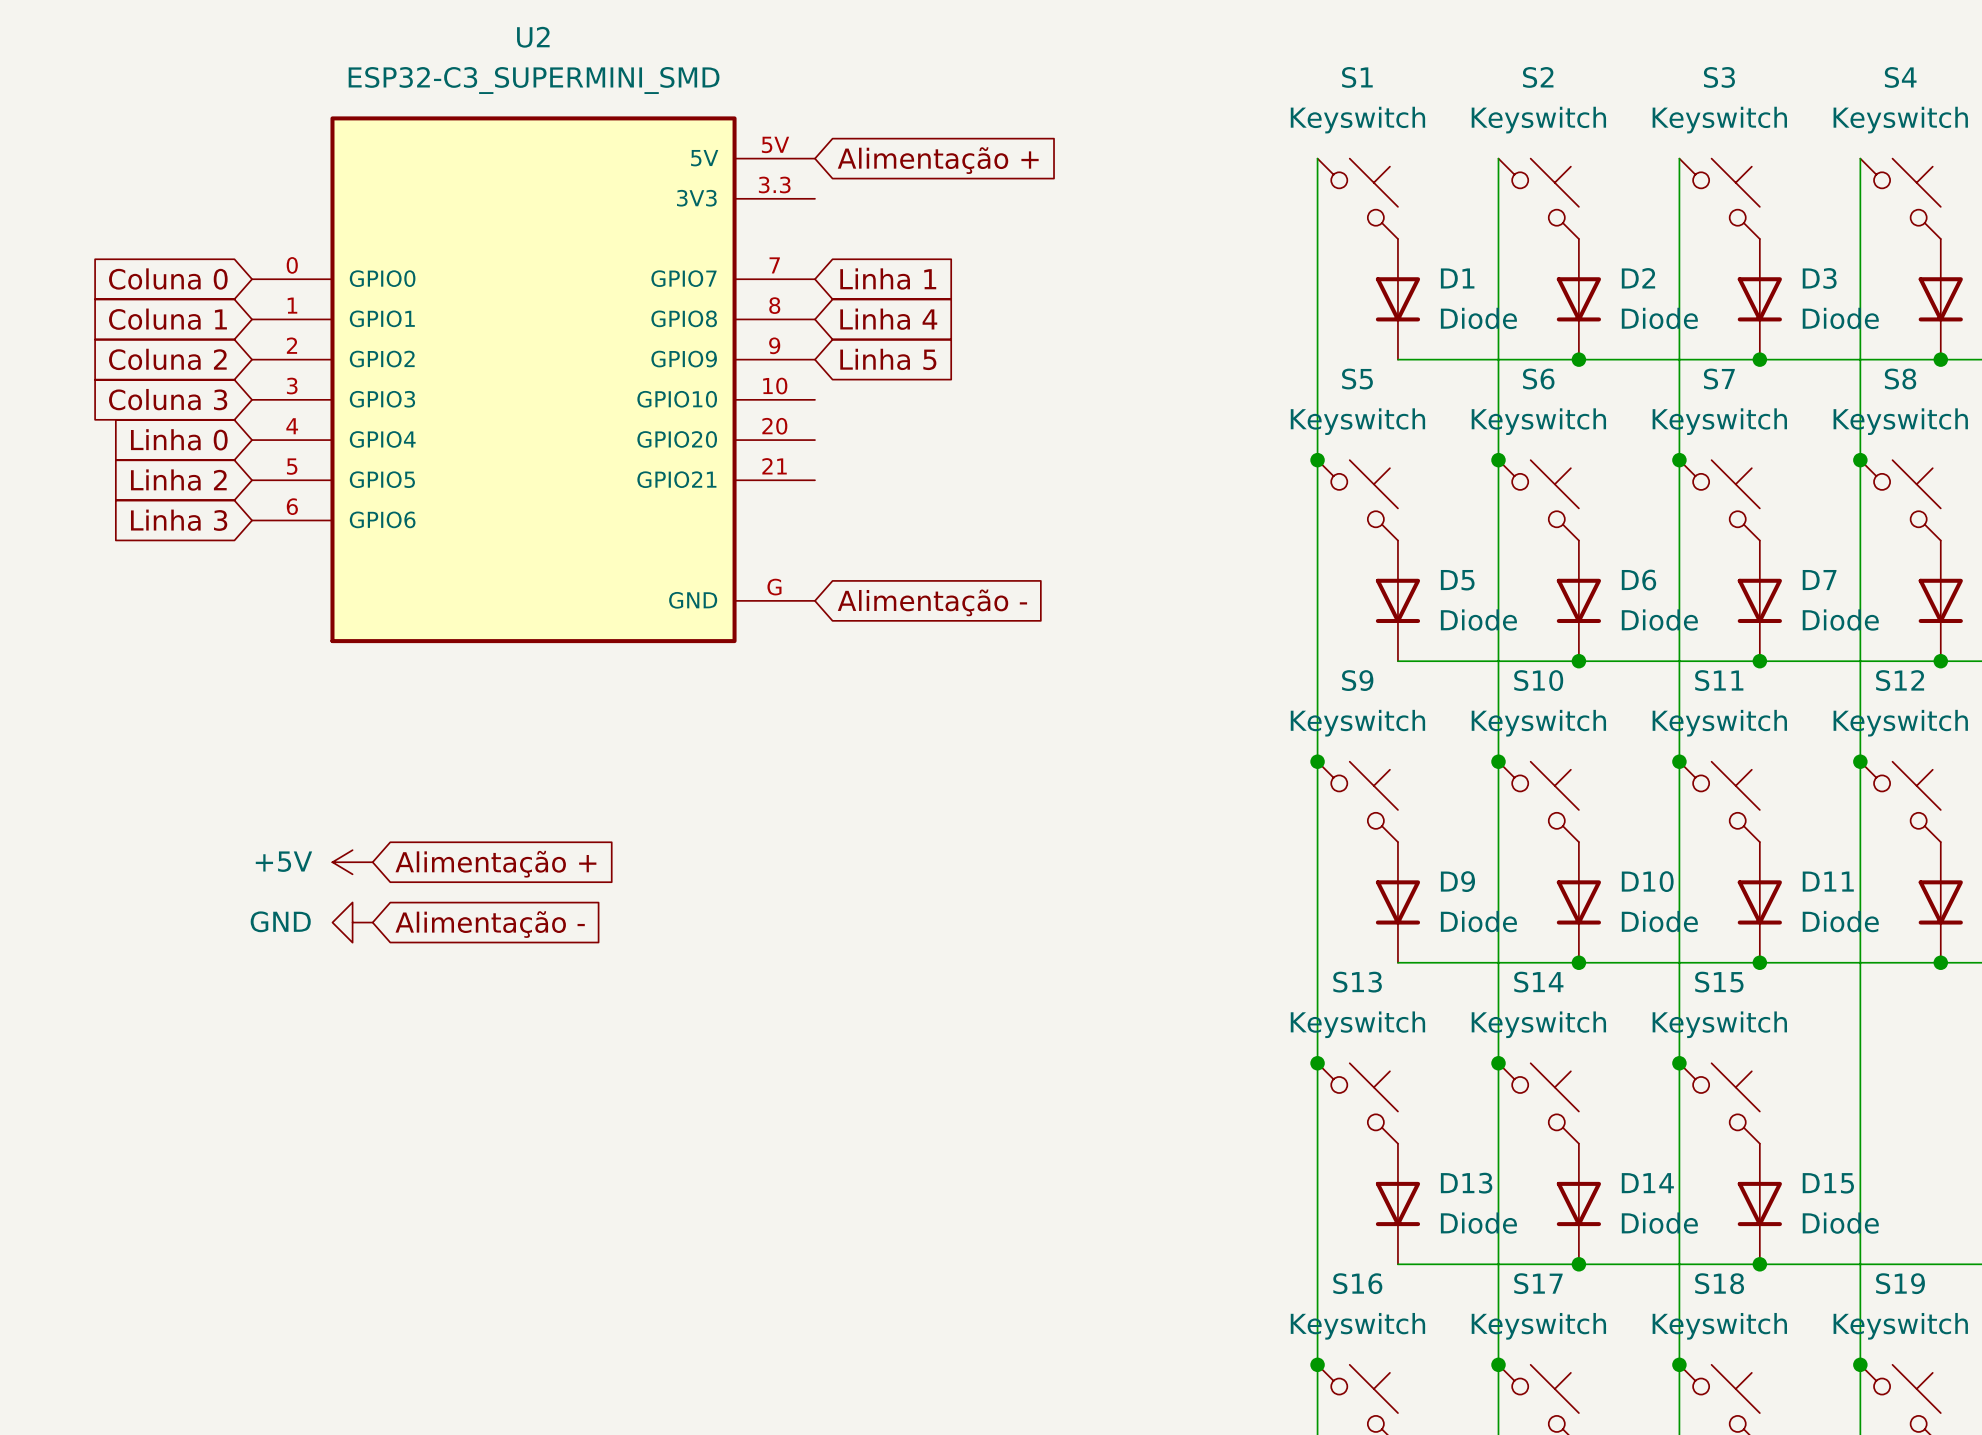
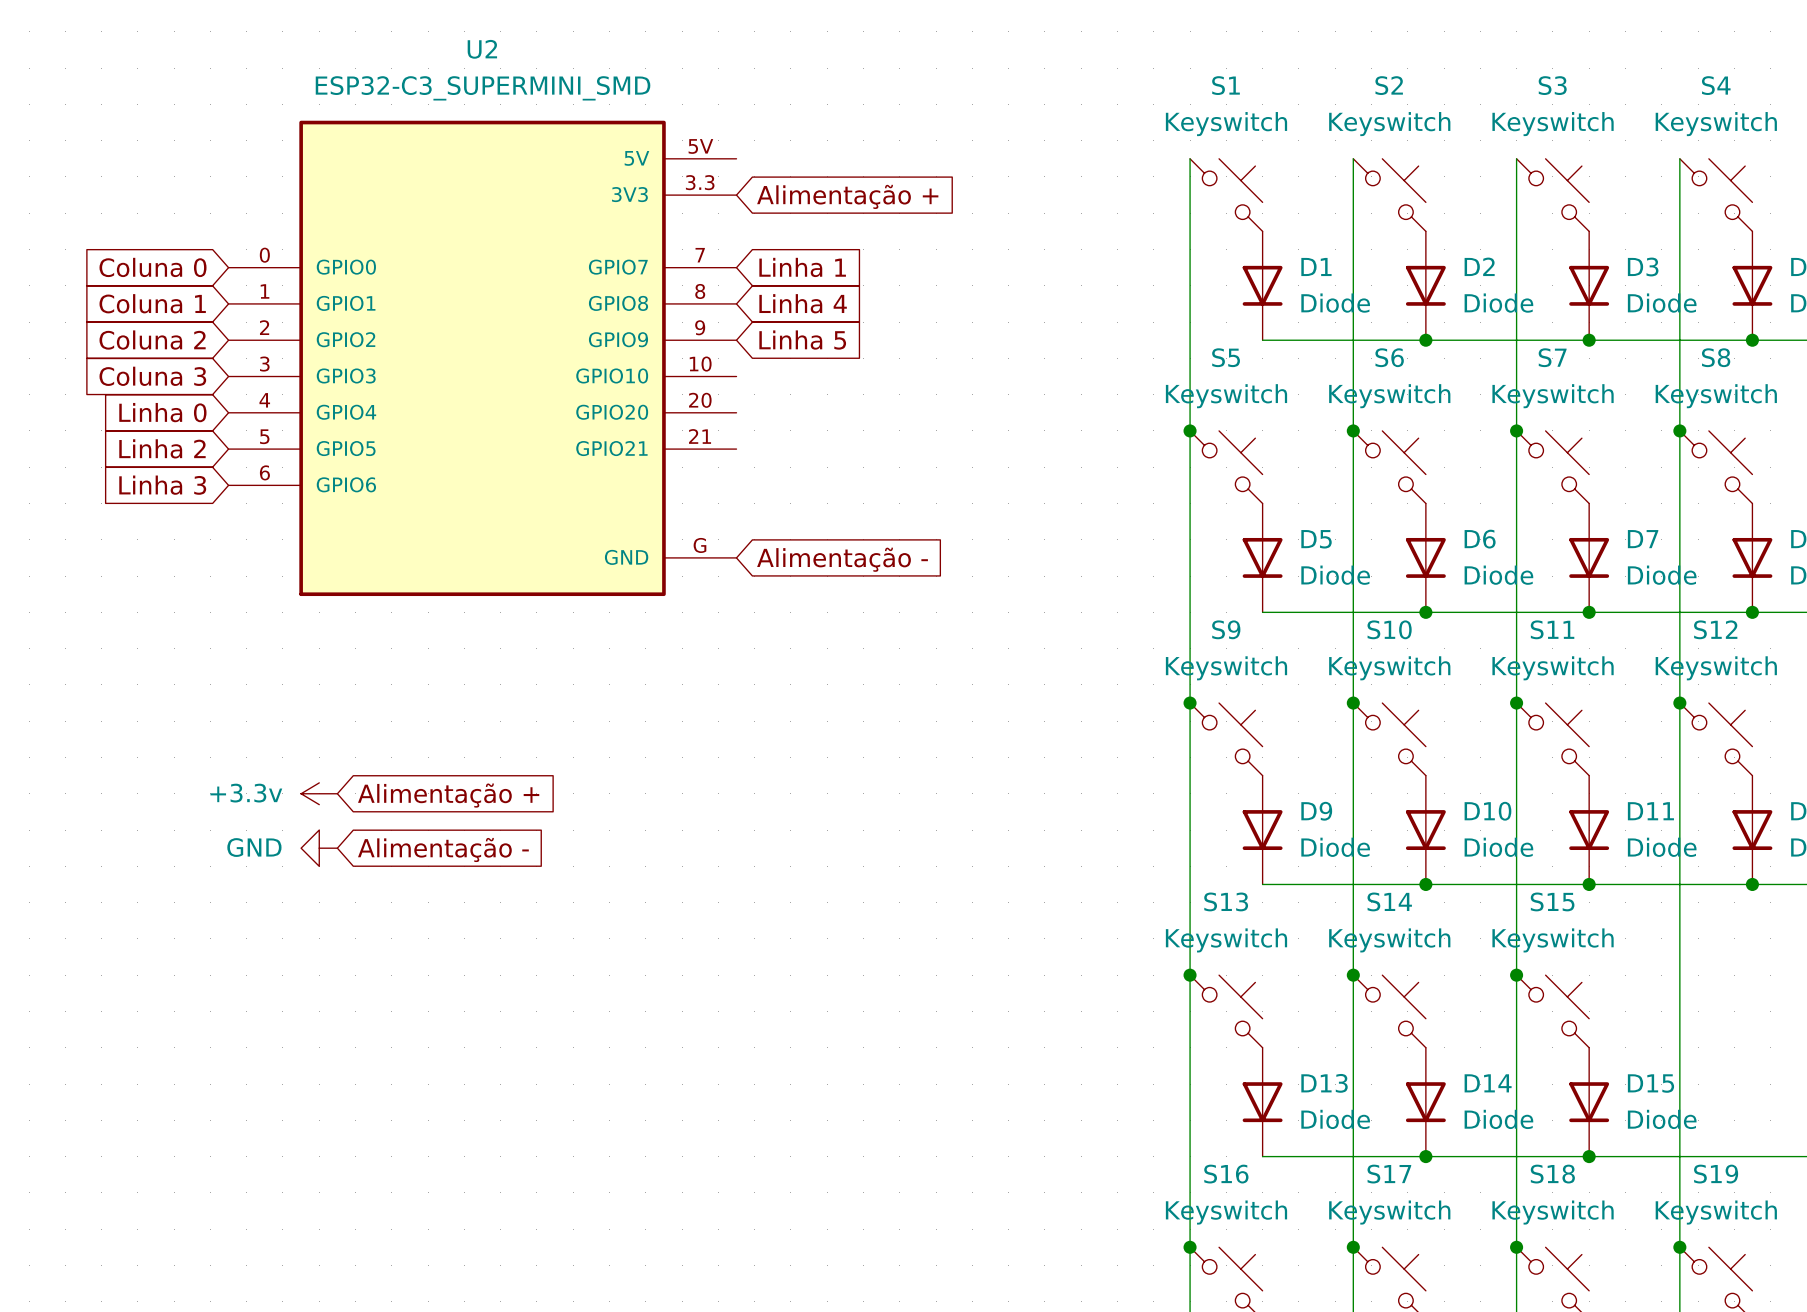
global label position: Alimentação + (938, 160) -> Alimentação + (847, 196)
power symbol: +5V (352, 862) -> +3.3v (319, 793)

